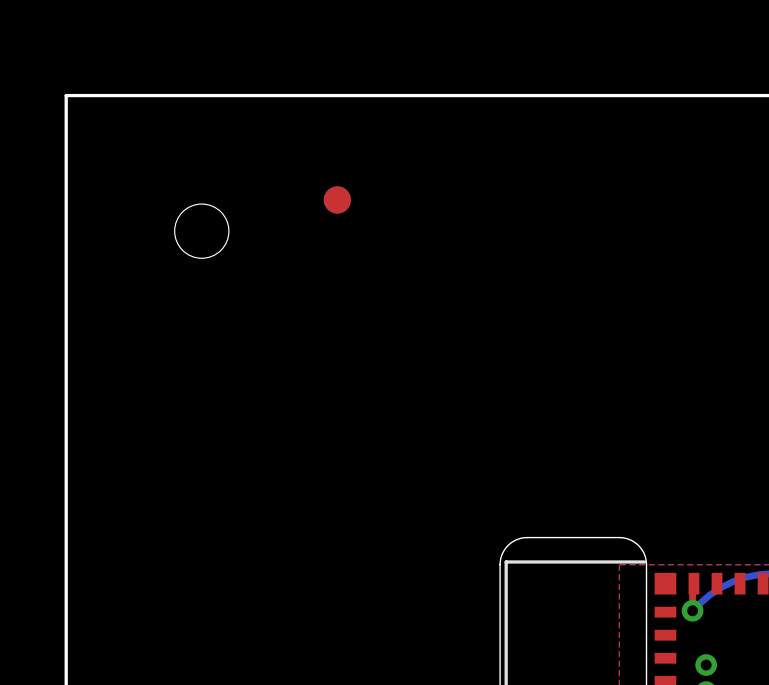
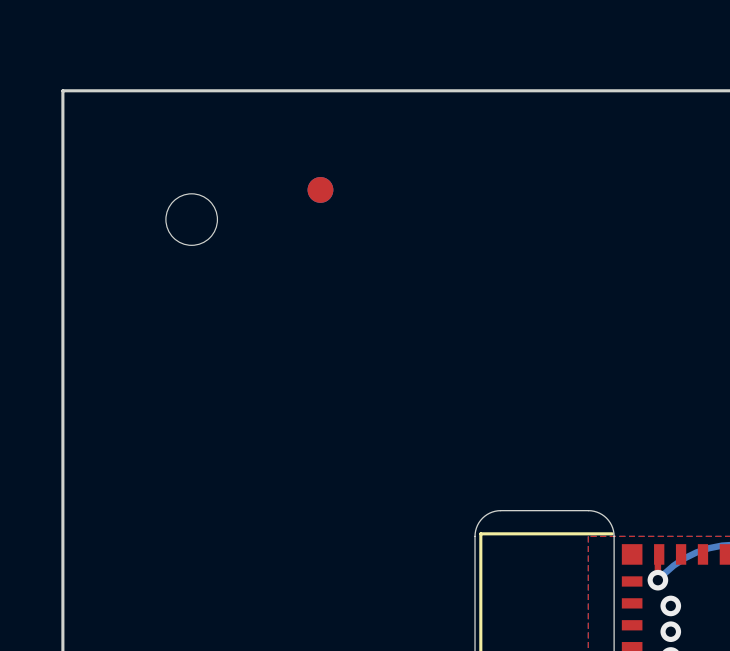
via: none -> (670, 605)

